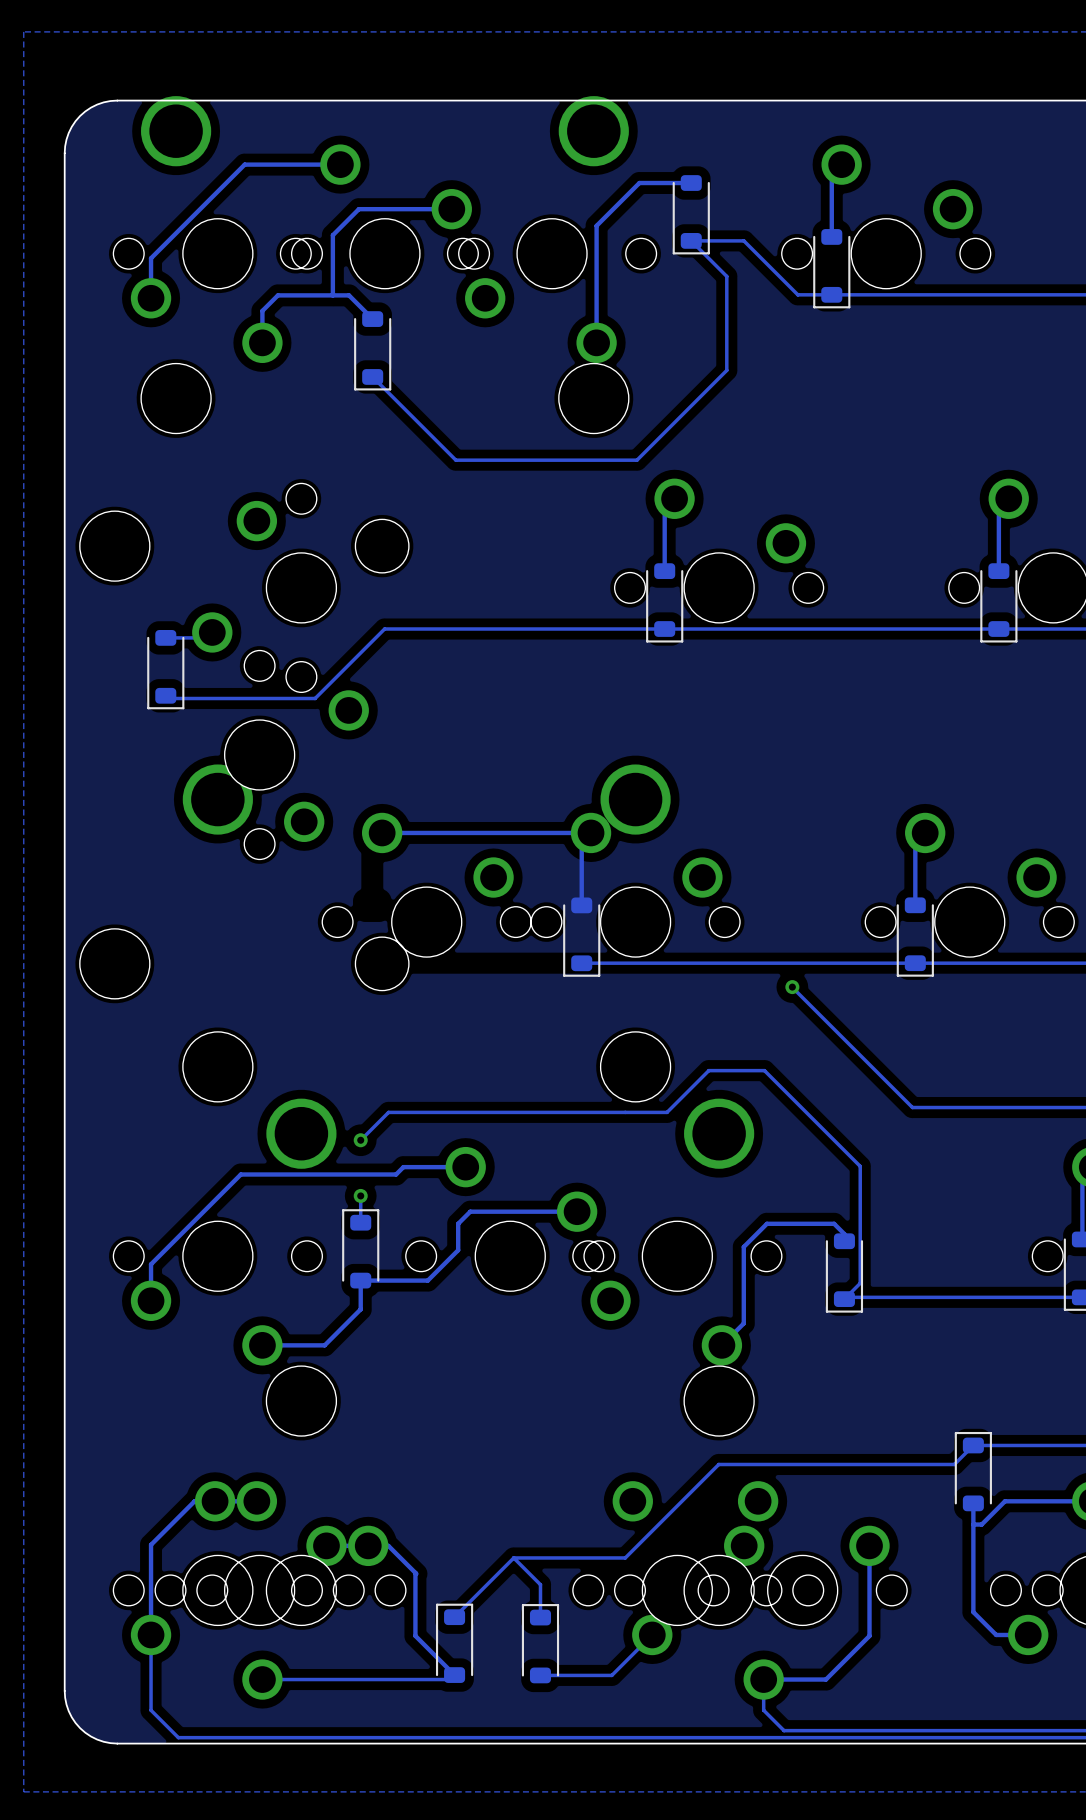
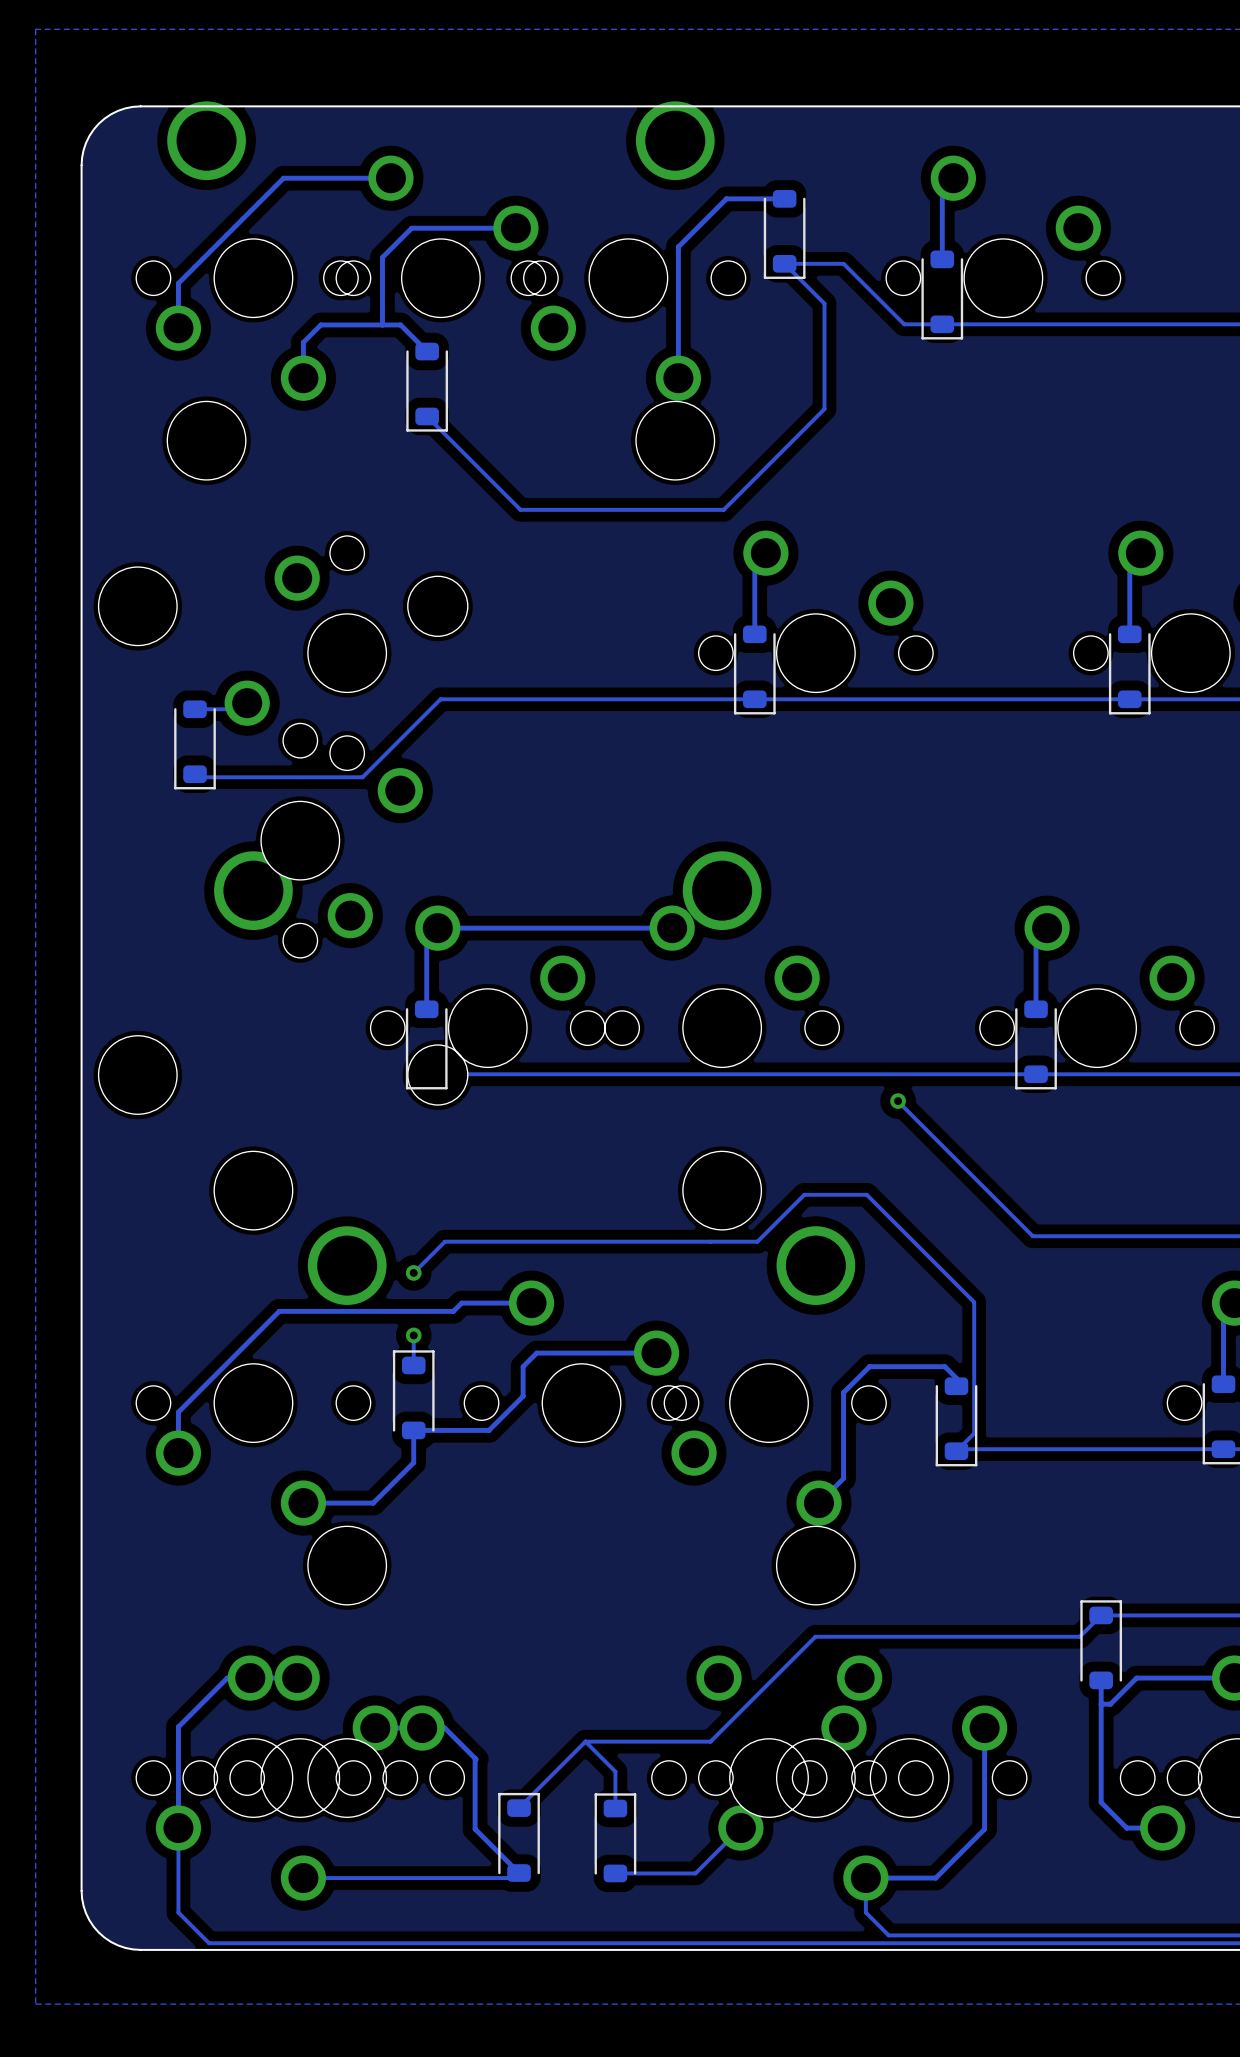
track: none -> (437, 928) (426, 939) (426, 1009)
track: (591, 832) (581, 842) (581, 905) -> none
part position: (581, 937) -> (426, 1044)
track: none -> (661, 1074) (426, 1074)

